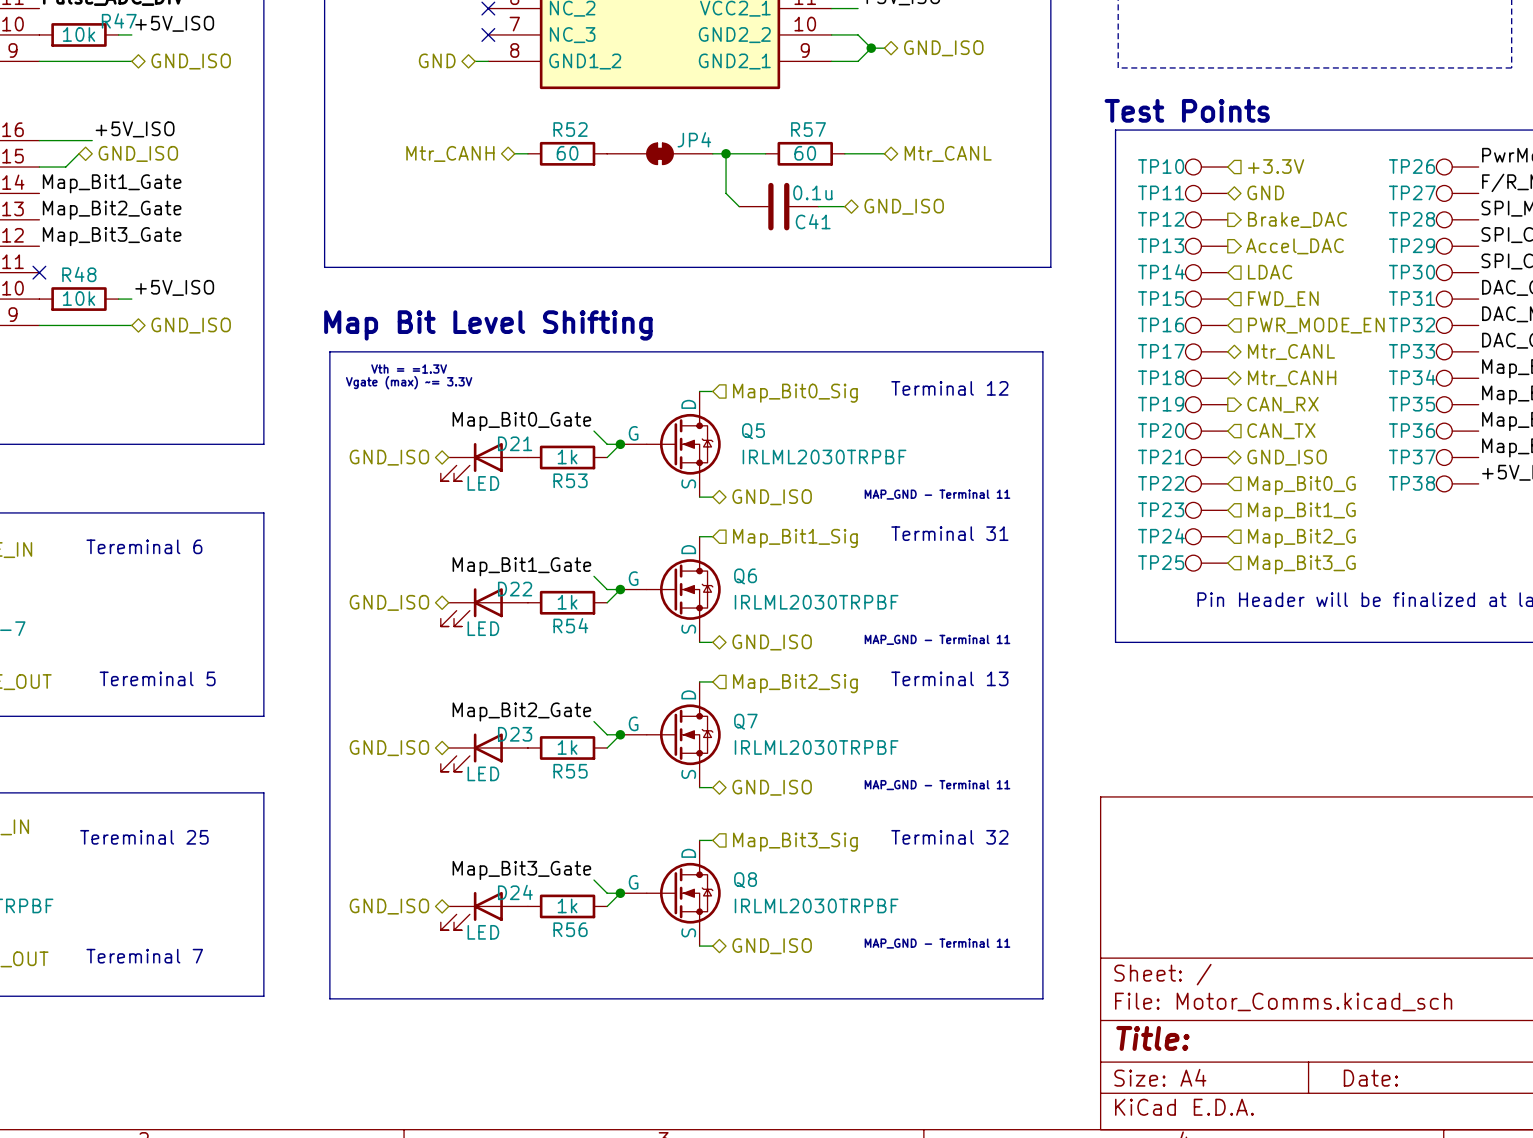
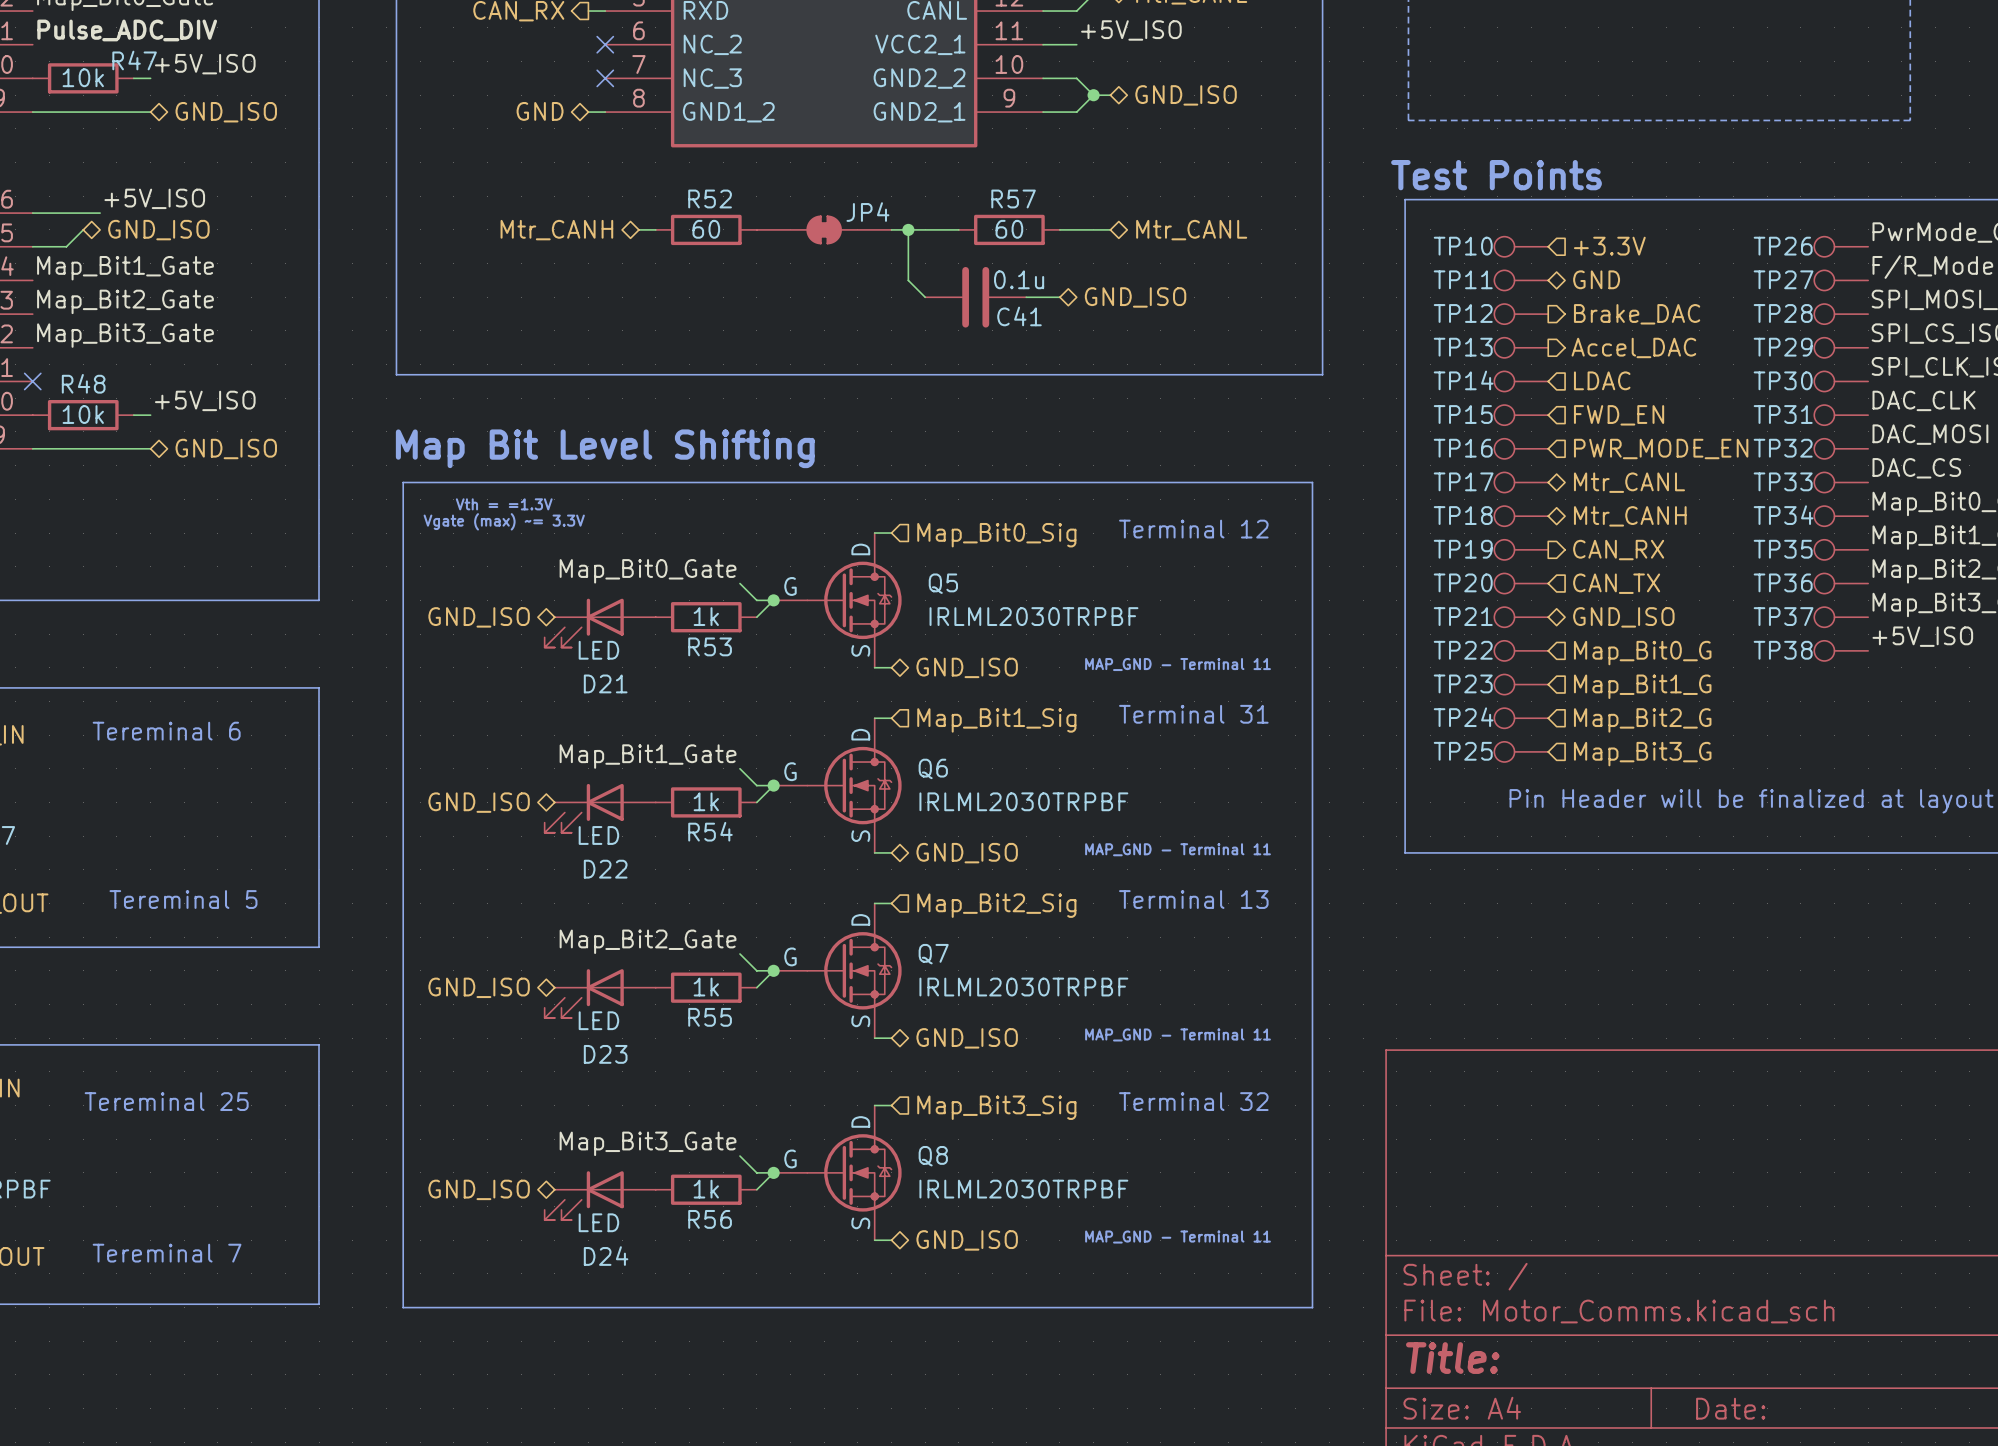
D21 name position: D21 (515, 443) -> D21 (605, 683)
D22 name position: D22 (515, 589) -> D22 (605, 869)
D23 name position: D23 (515, 734) -> D23 (605, 1054)
D24 name position: D24 (515, 892) -> D24 (606, 1256)

